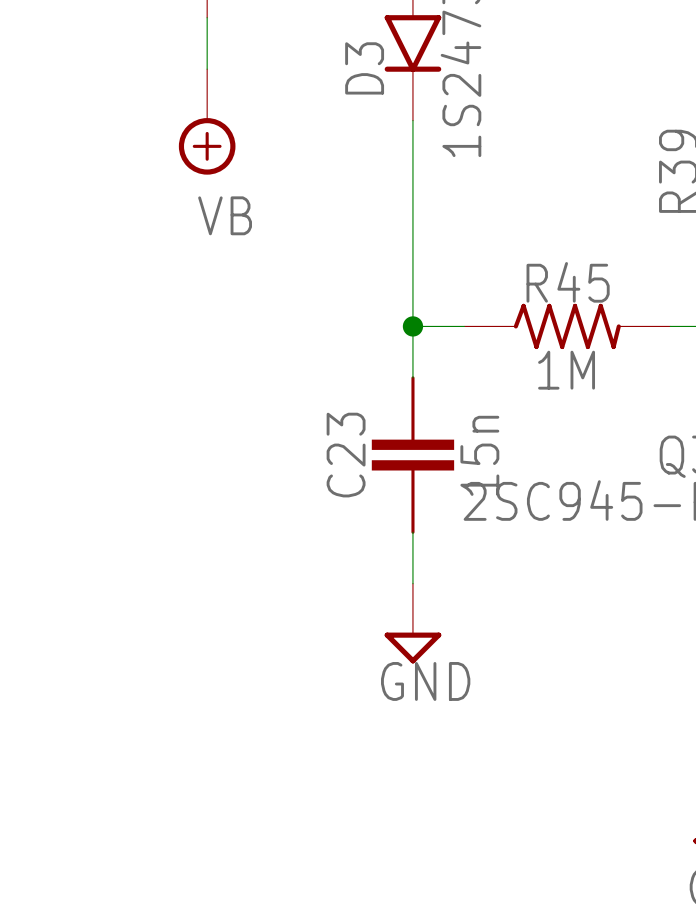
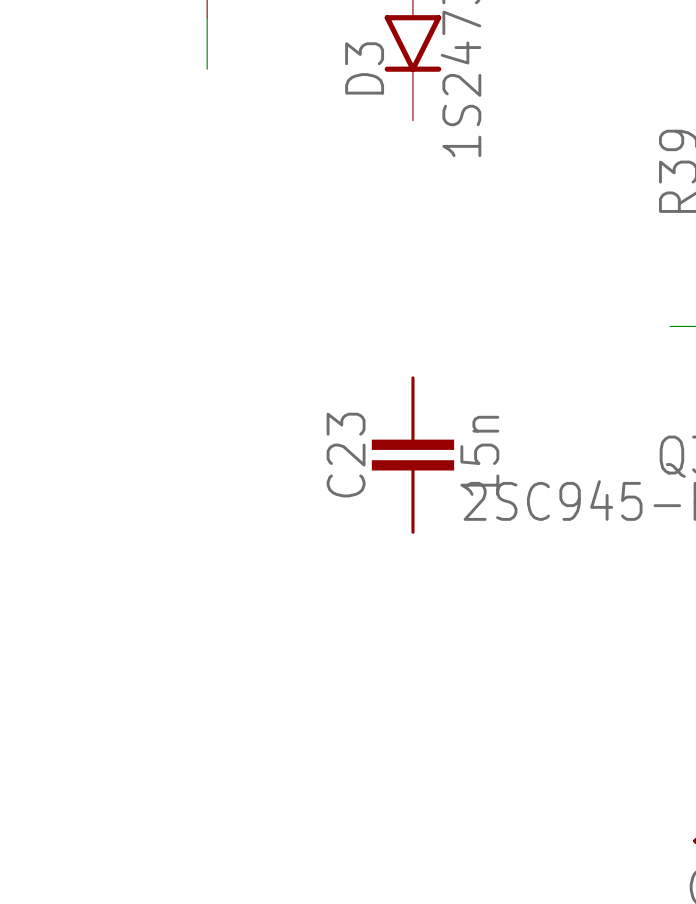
wire: (412, 120) (412, 377) -> none
power symbol: VB (207, 121) -> none
wire: (412, 326) (464, 326) -> none
junction: (412, 326) -> none
R45: 1M (567, 326) -> none
wire: (412, 532) (412, 583) -> none
power symbol: GND (412, 623) -> none

